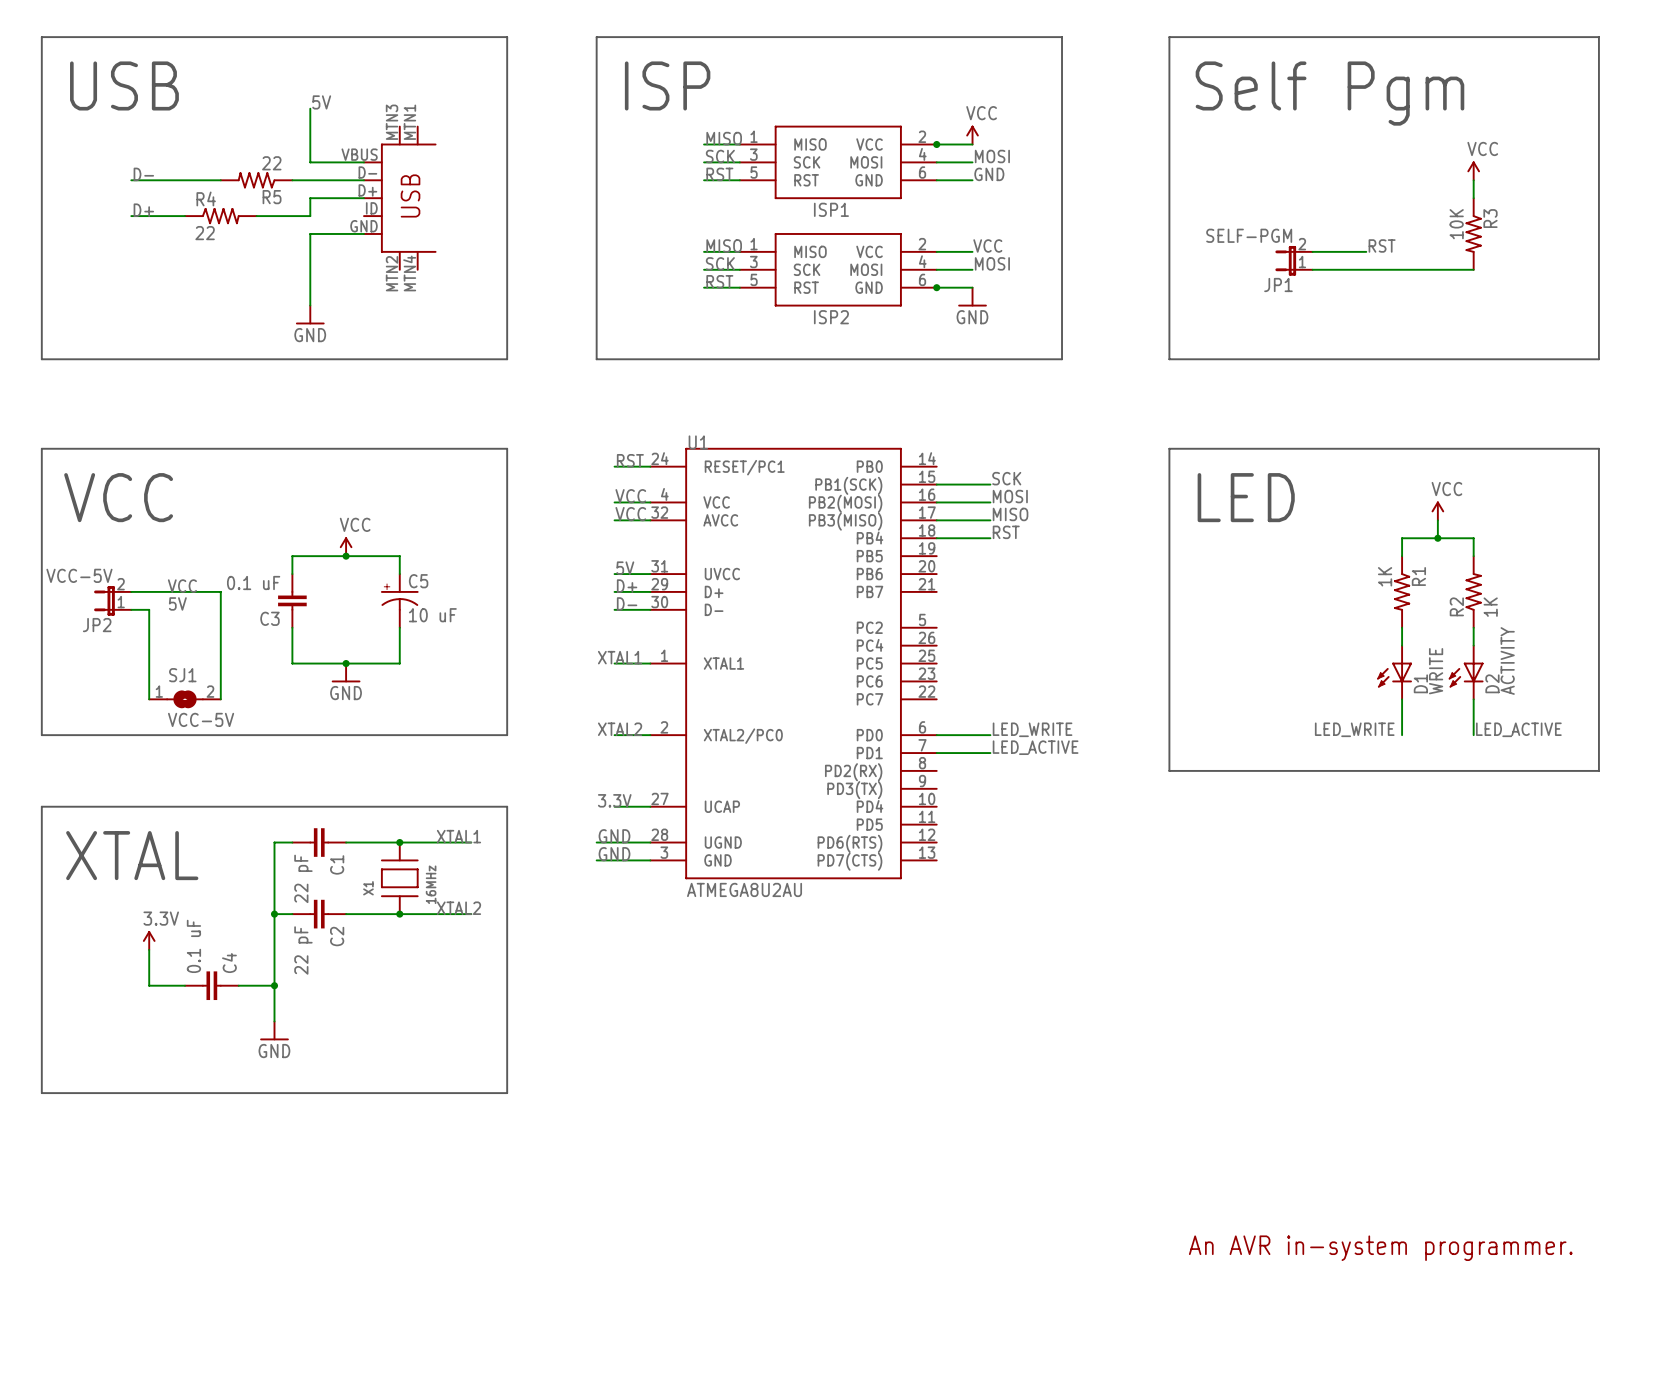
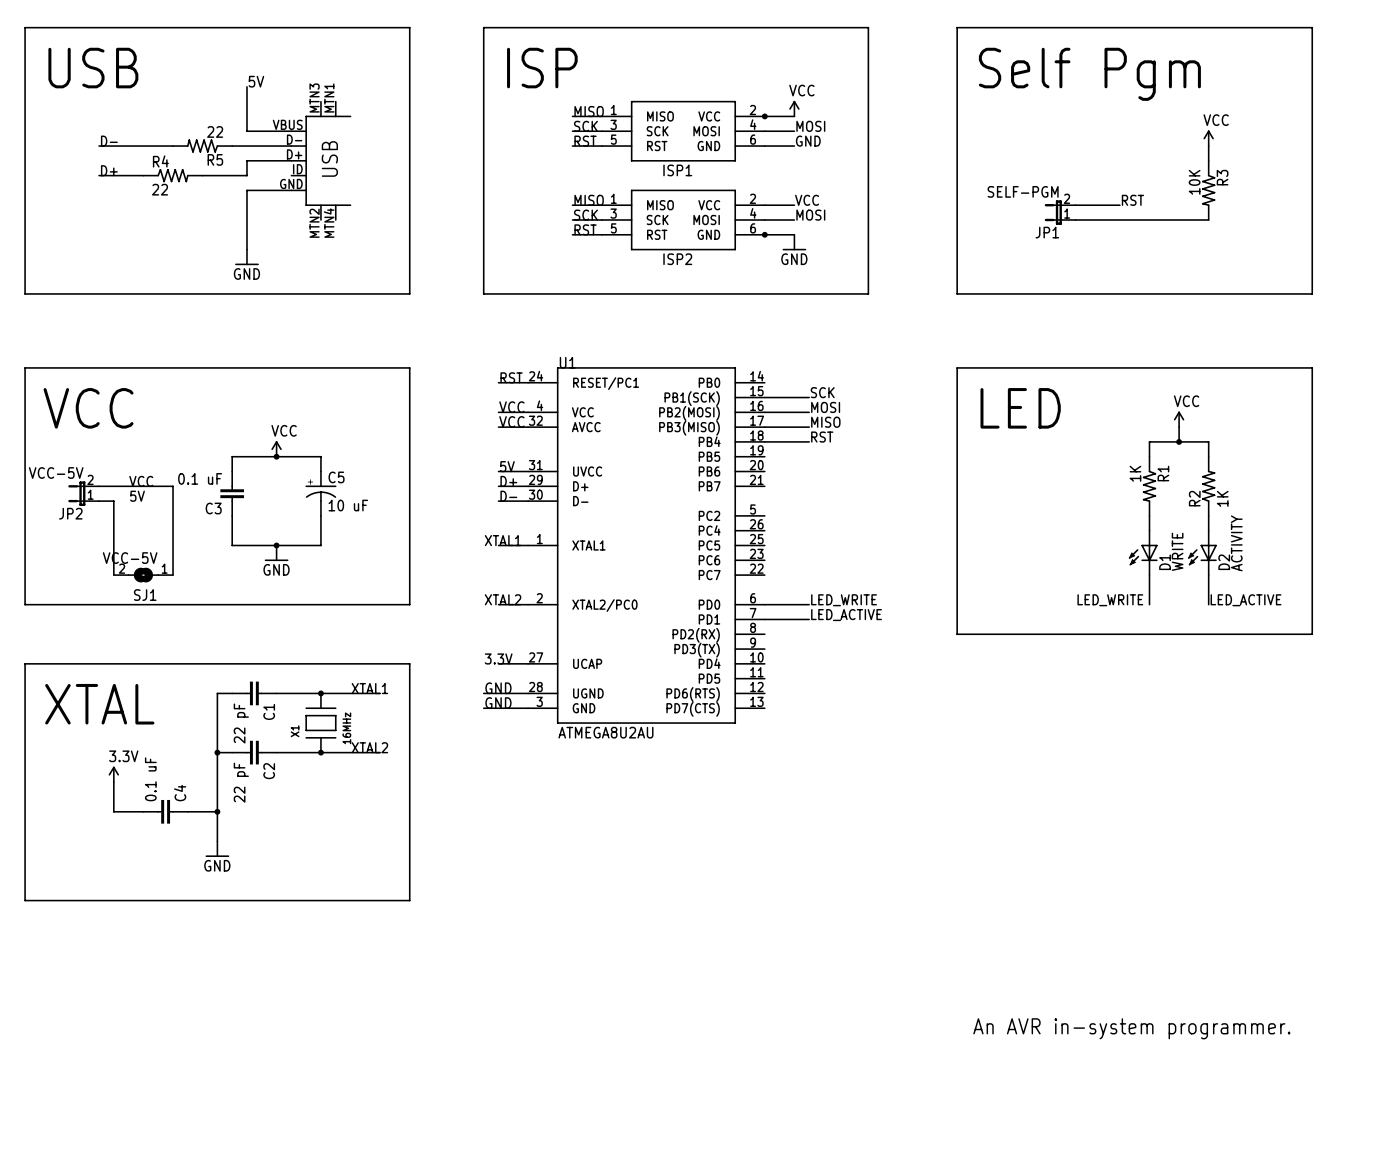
SJ1 rotation: 0° (185, 699) -> 180° (143, 575)

